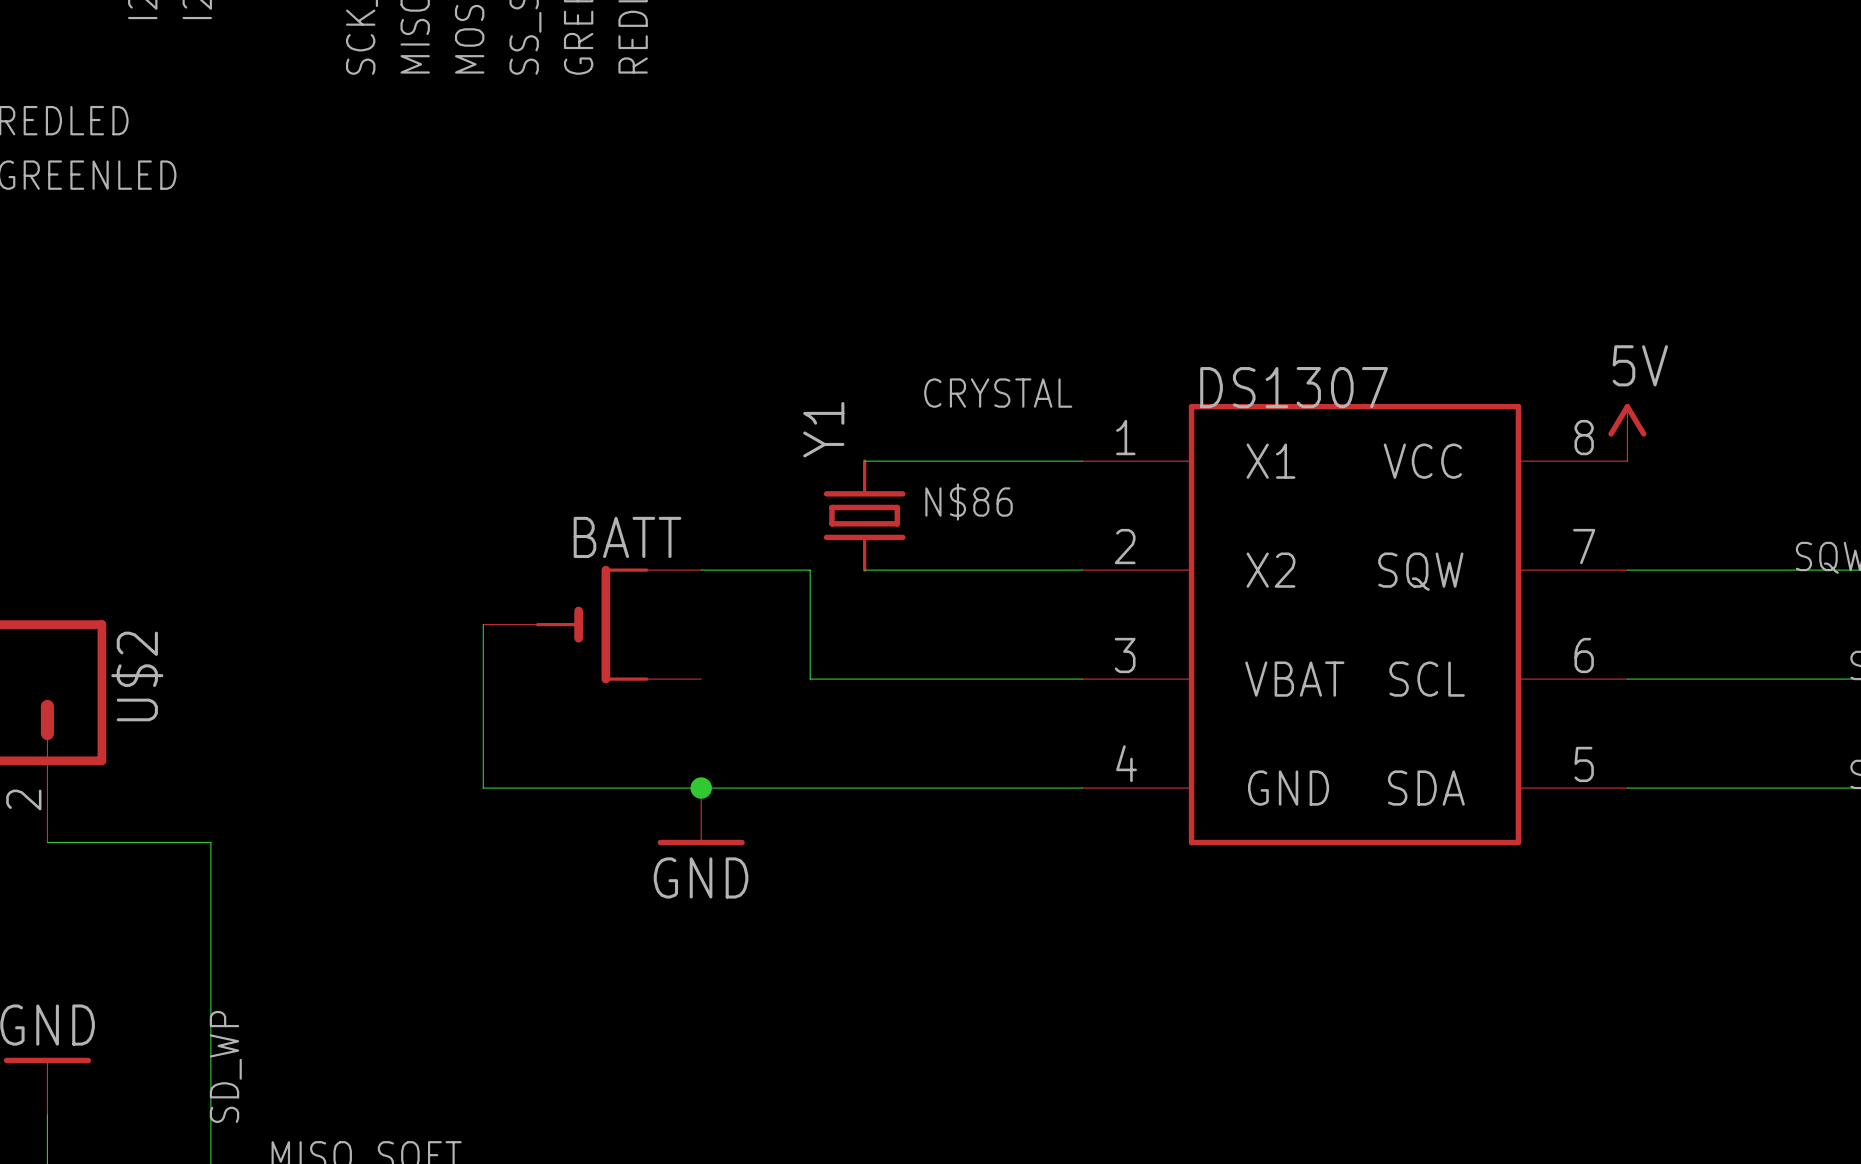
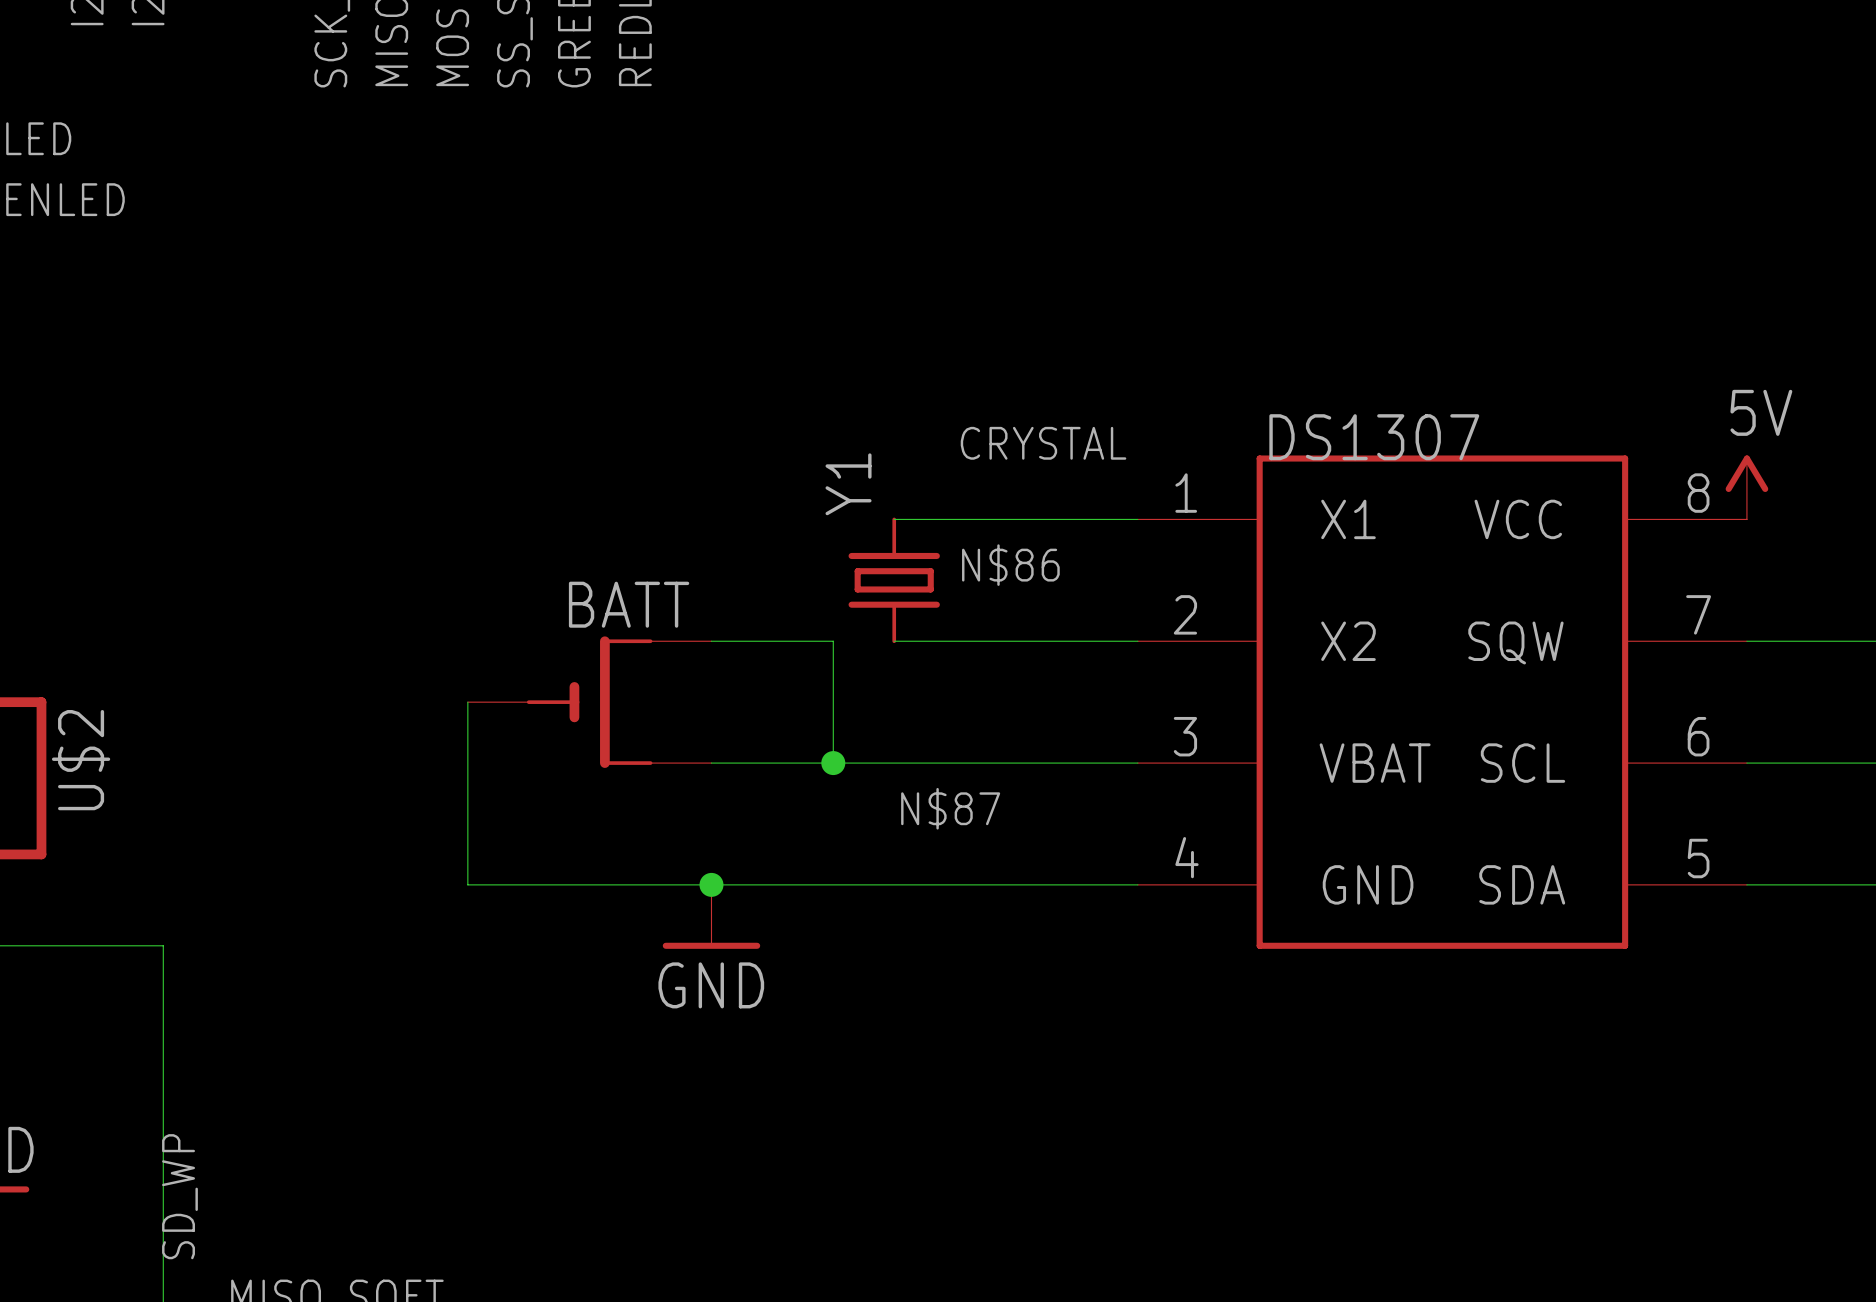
wire: none -> (711, 763) (833, 763)
junction: none -> (833, 763)
label: none -> N$87 (950, 808)

